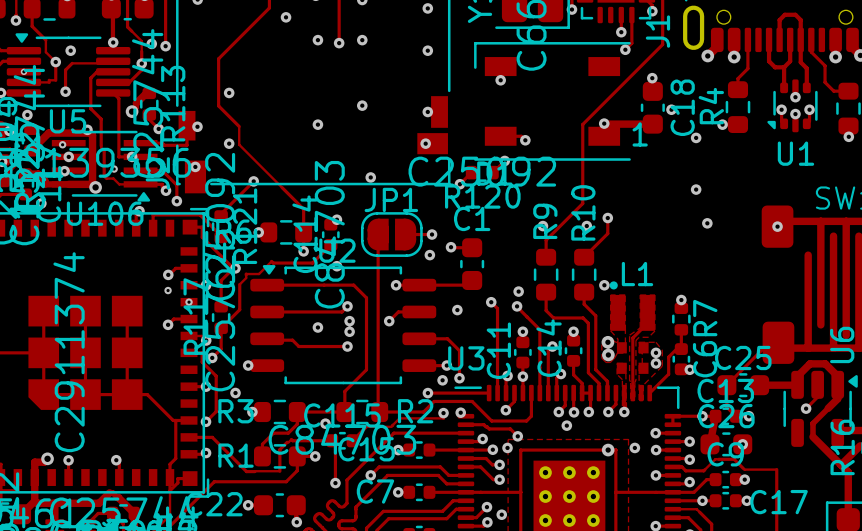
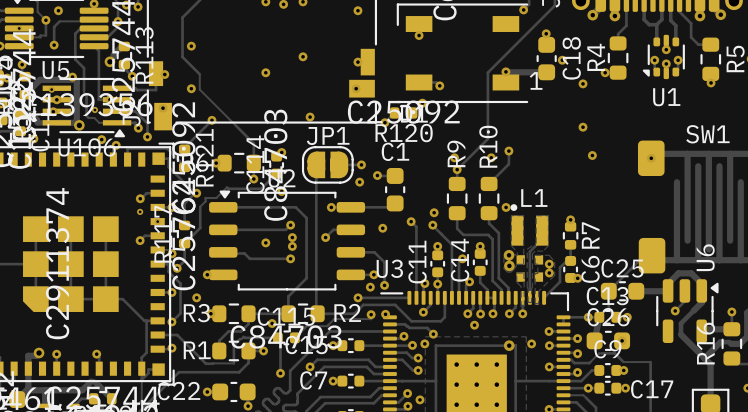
via: none -> (101, 139)
via: none -> (457, 169)

